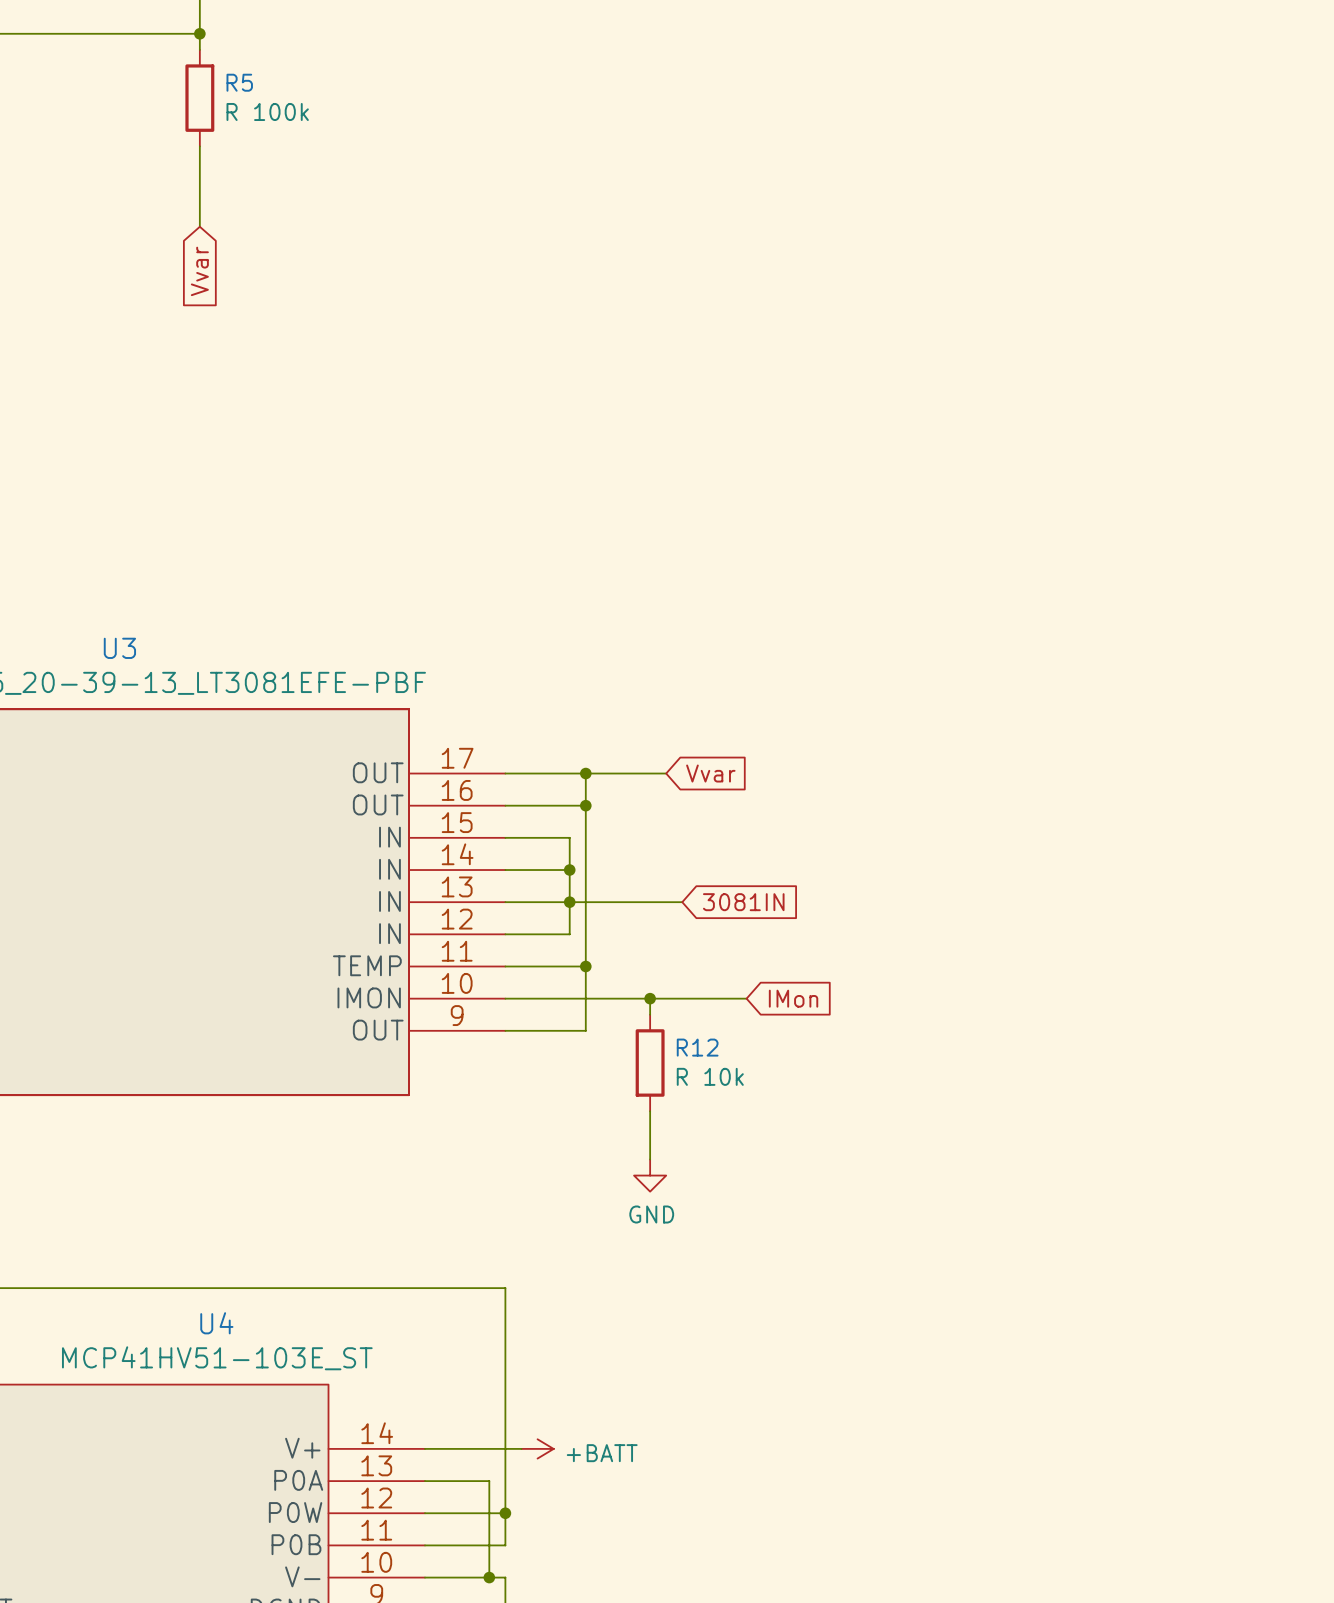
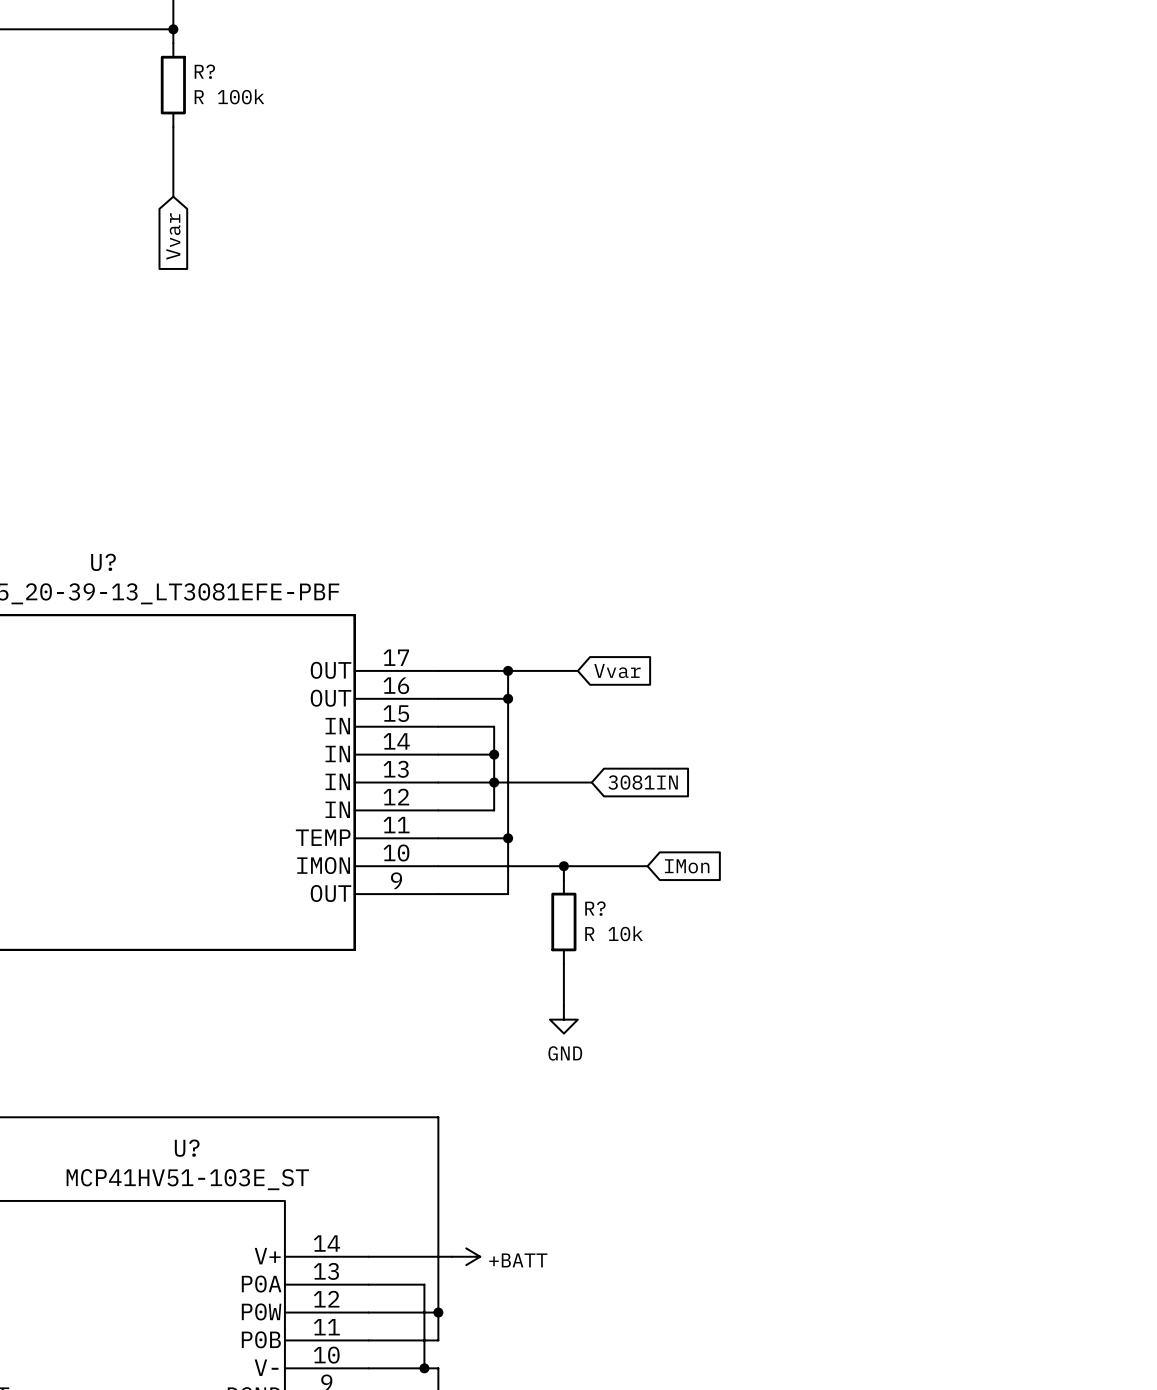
R5 name: R5 (239, 82) -> R? (204, 71)
U3 name: U3 (119, 648) -> U? (103, 562)
R12 name: R12 (697, 1047) -> R? (595, 908)
U4 name: U4 (216, 1323) -> U? (187, 1148)

